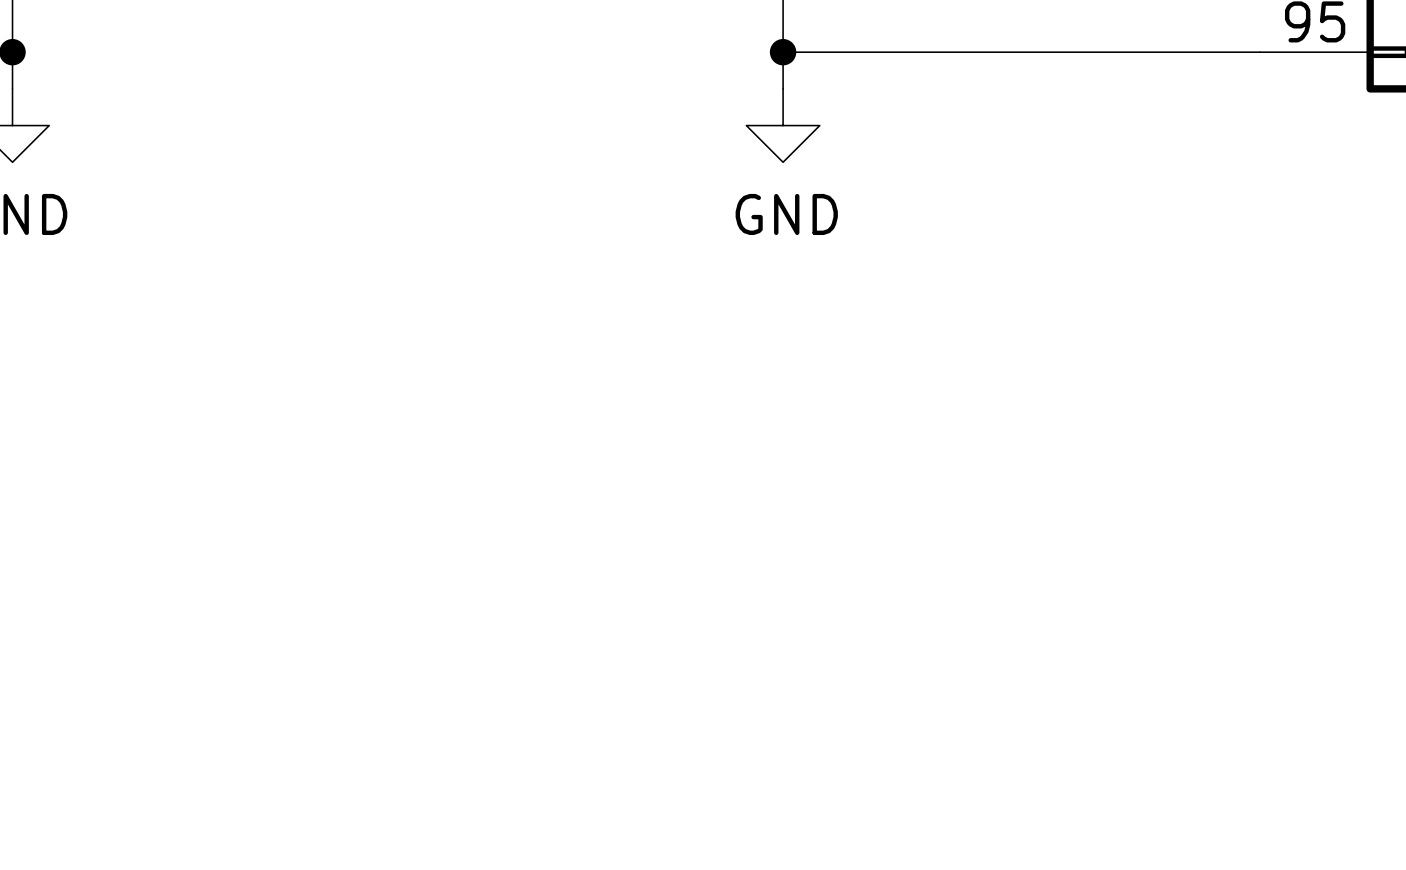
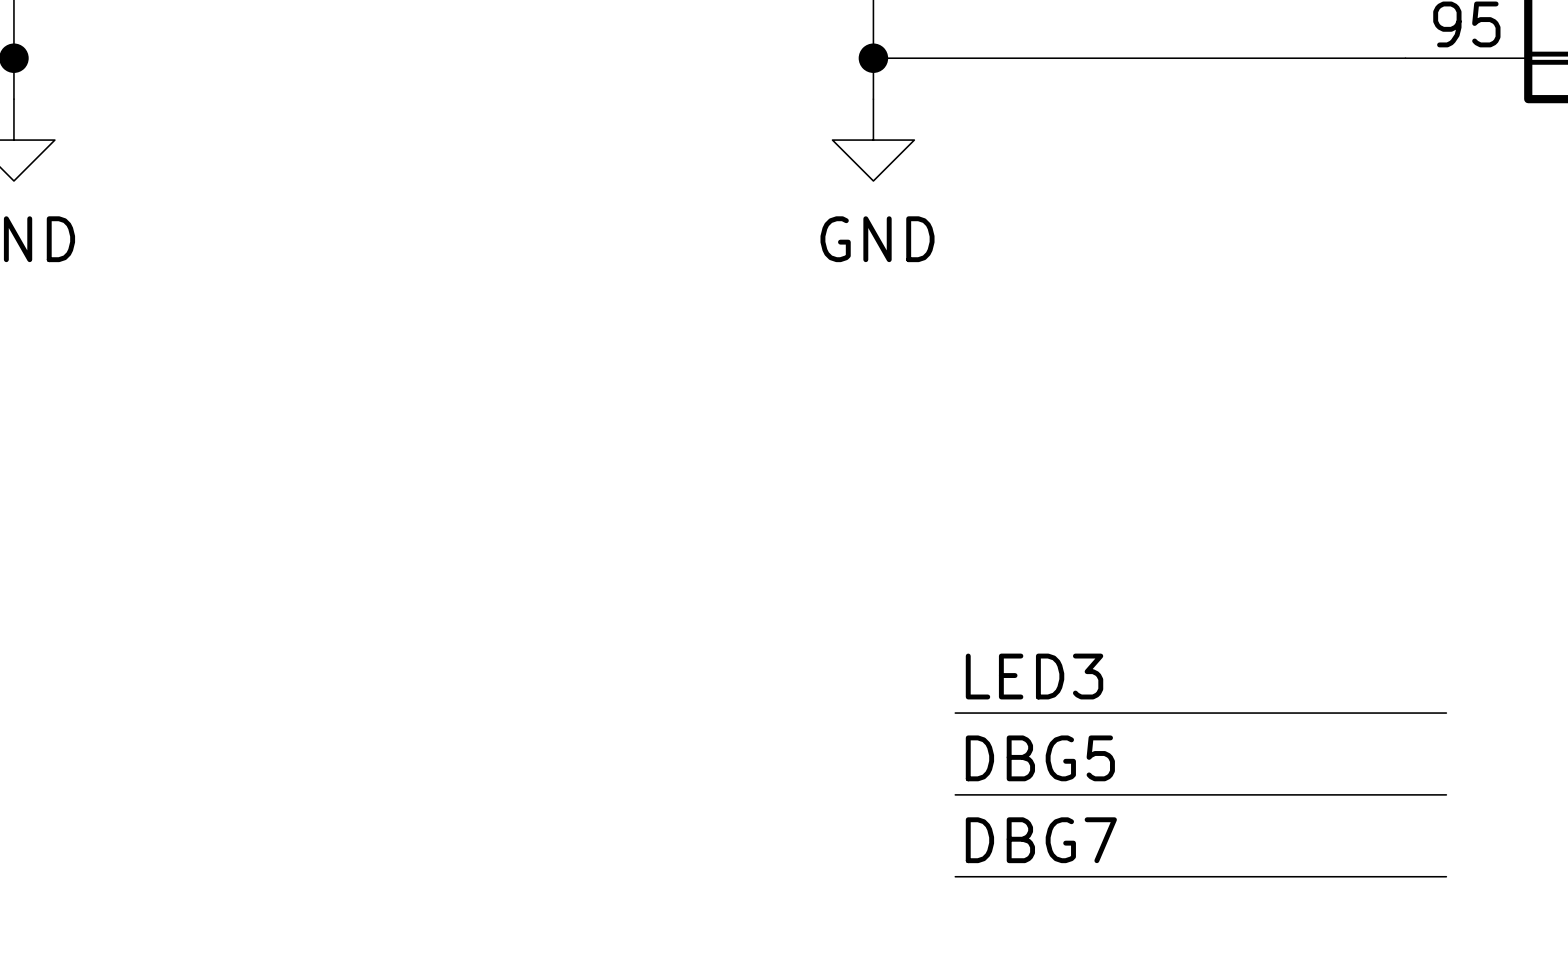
label: none -> LED3 (1034, 676)
wire: none -> (955, 713) (1446, 713)
label: none -> DBG5 (1040, 758)
wire: none -> (955, 794) (1446, 794)
label: none -> DBG7 (1041, 840)
wire: none -> (955, 876) (1446, 876)

